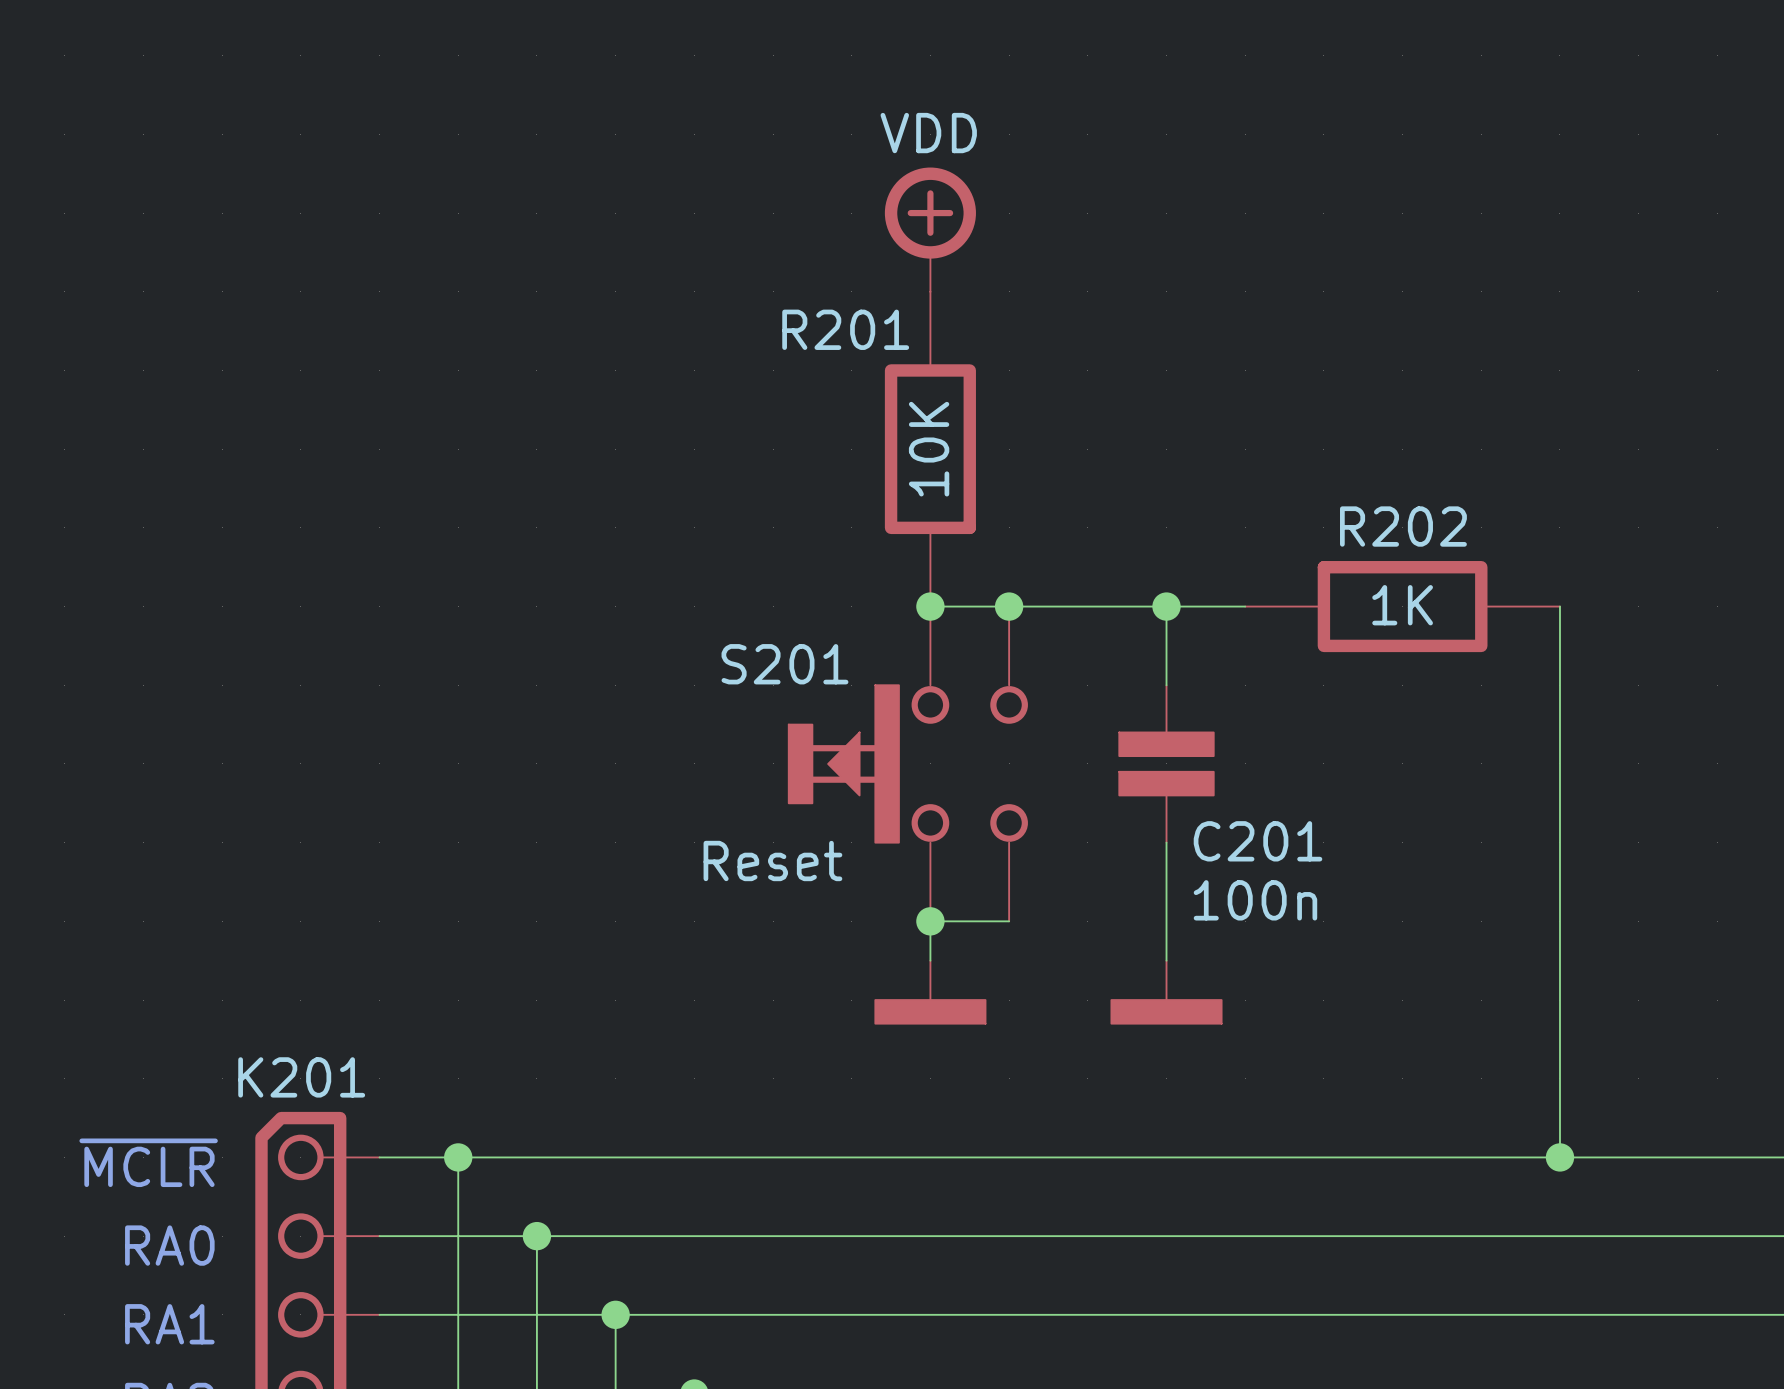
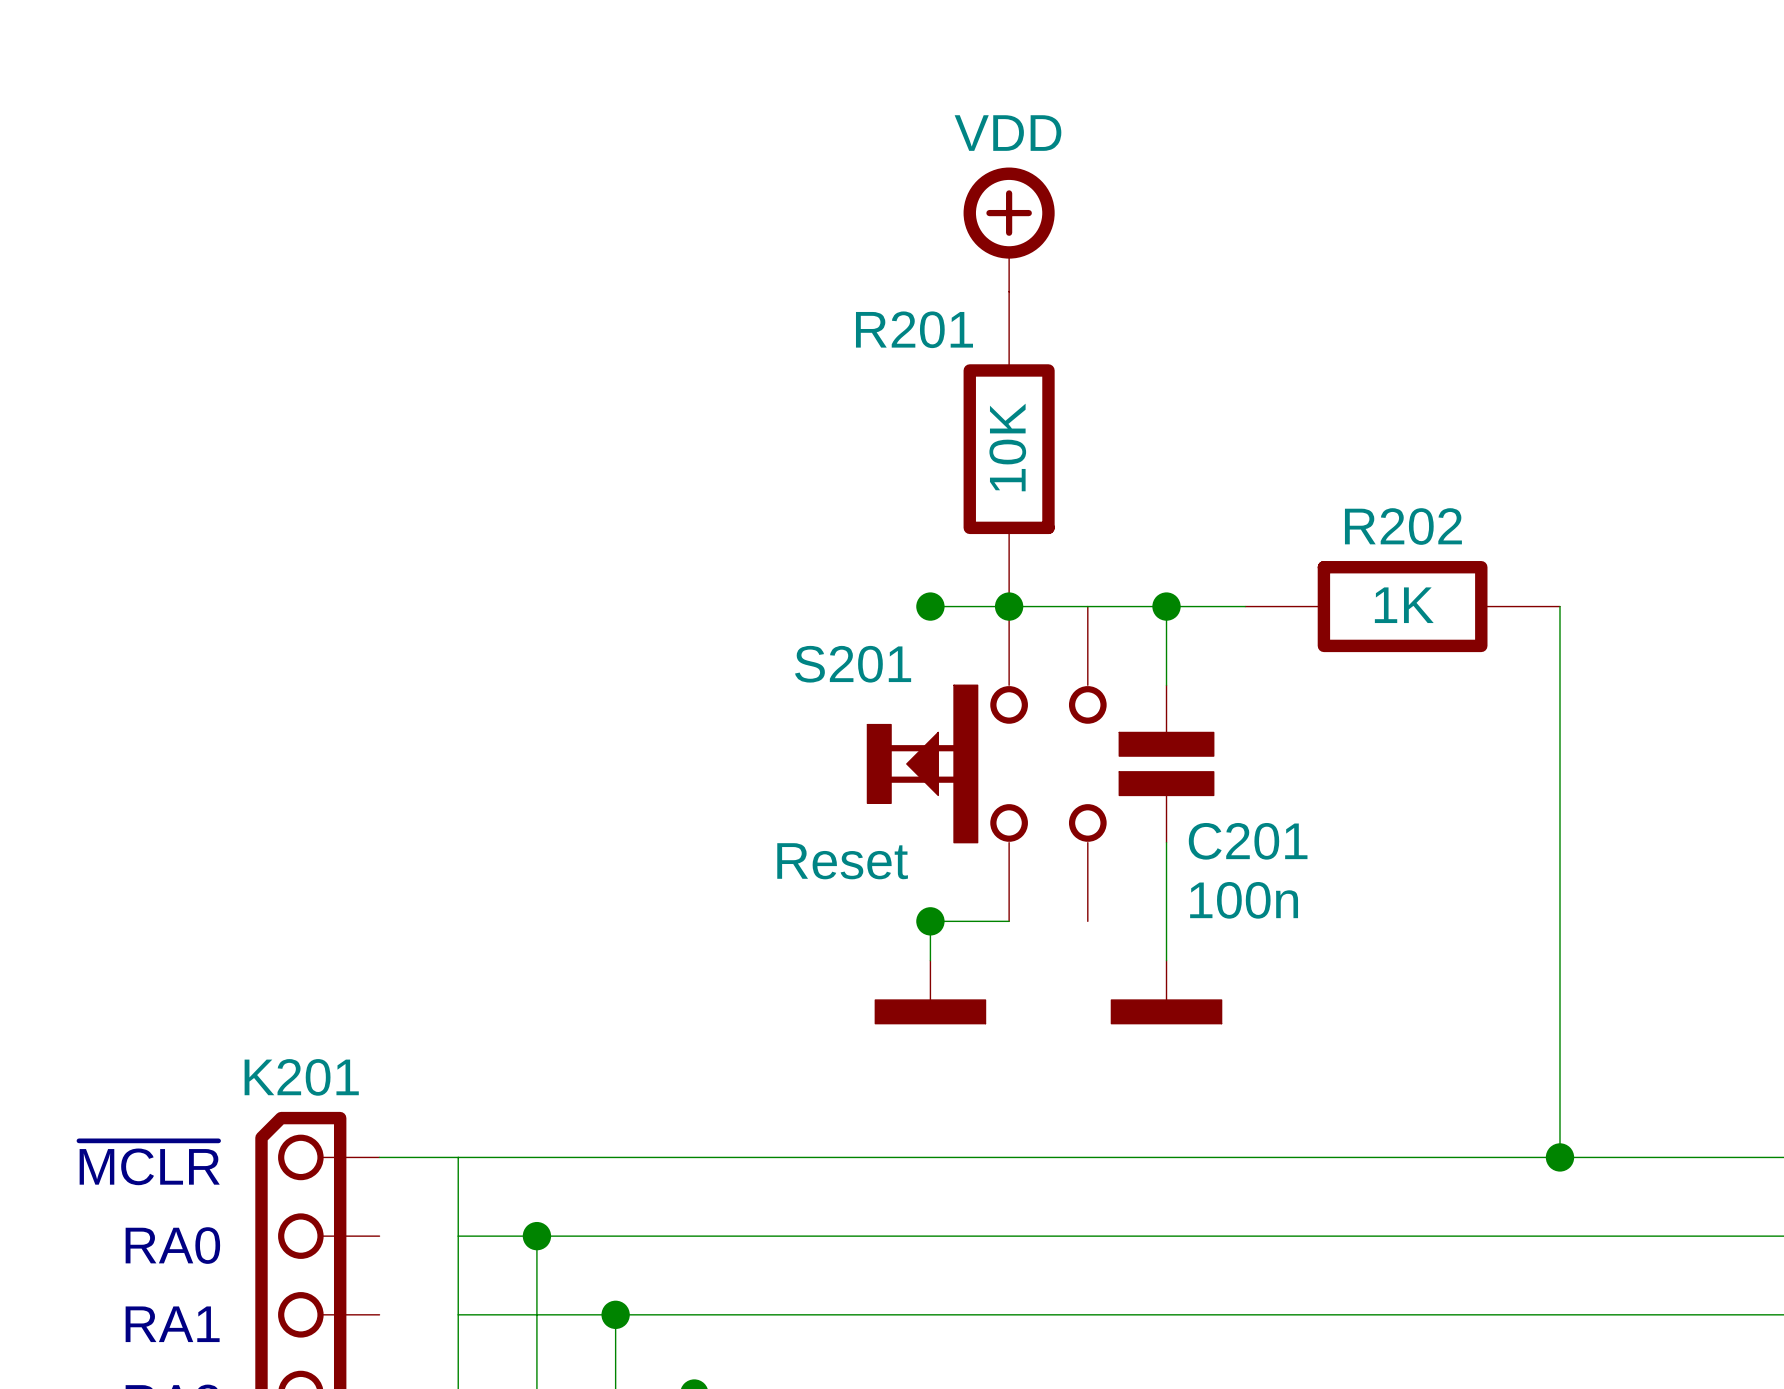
power symbol position: (930, 229) -> (1009, 229)
R201 position: (930, 449) -> (1009, 449)
S201 position: (908, 763) -> (987, 763)
junction: (458, 1157) -> none
wire: (379, 1236) (458, 1236) -> none
wire: (379, 1314) (458, 1314) -> none

